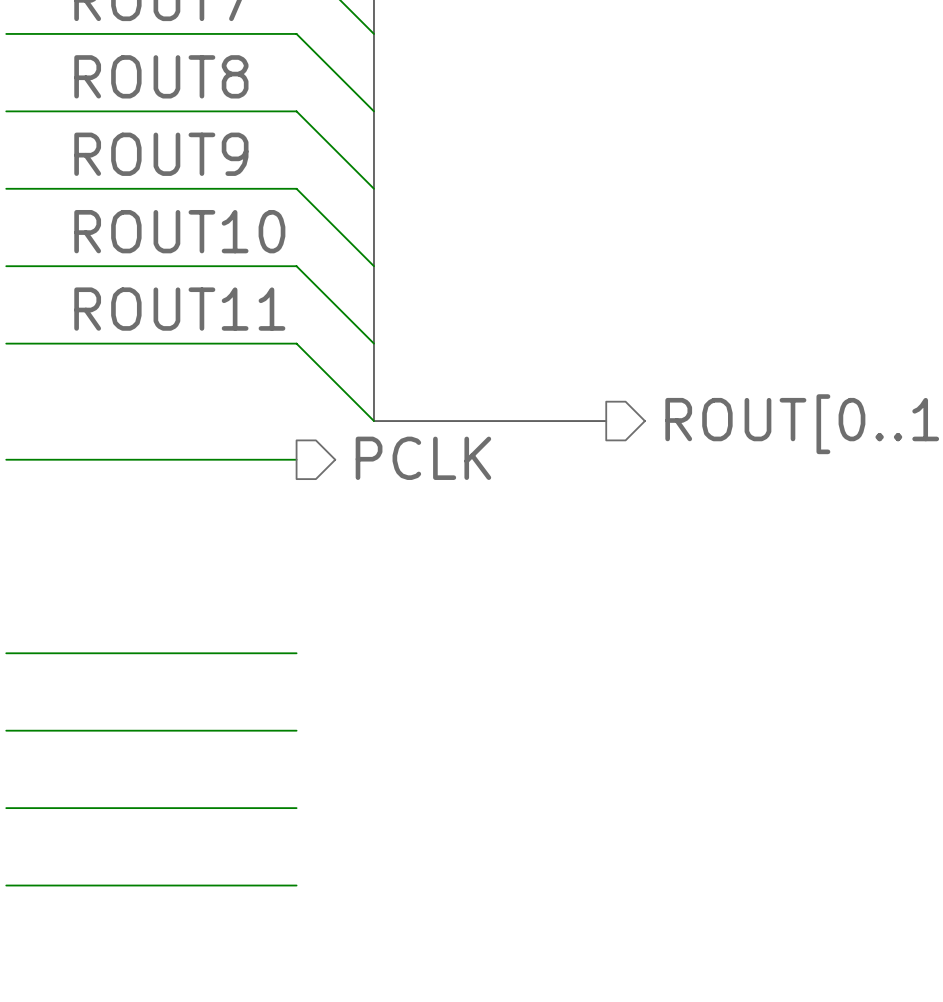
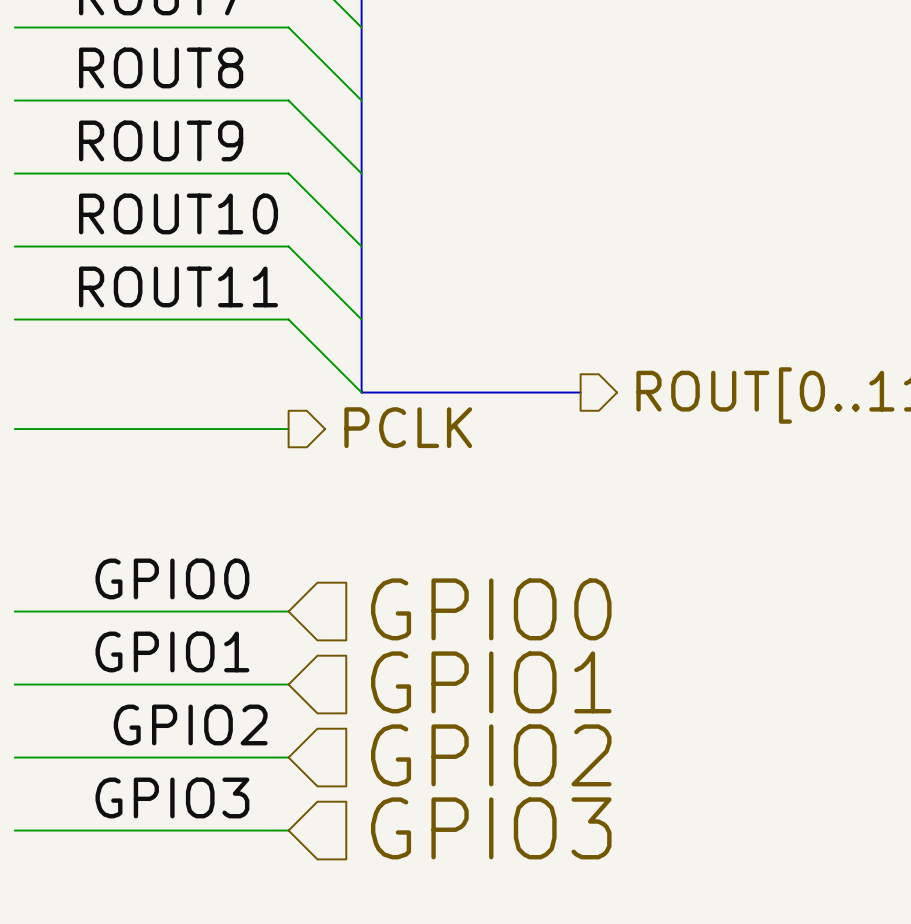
label: none -> GPIO0 (172, 578)
hierarchical label: none -> GPIO0 (491, 609)
label: none -> GPIO1 (172, 651)
hierarchical label: none -> GPIO1 (491, 682)
label: none -> GPIO2 (190, 724)
hierarchical label: none -> GPIO2 (491, 755)
label: none -> GPIO3 (172, 797)
hierarchical label: none -> GPIO3 (491, 828)

